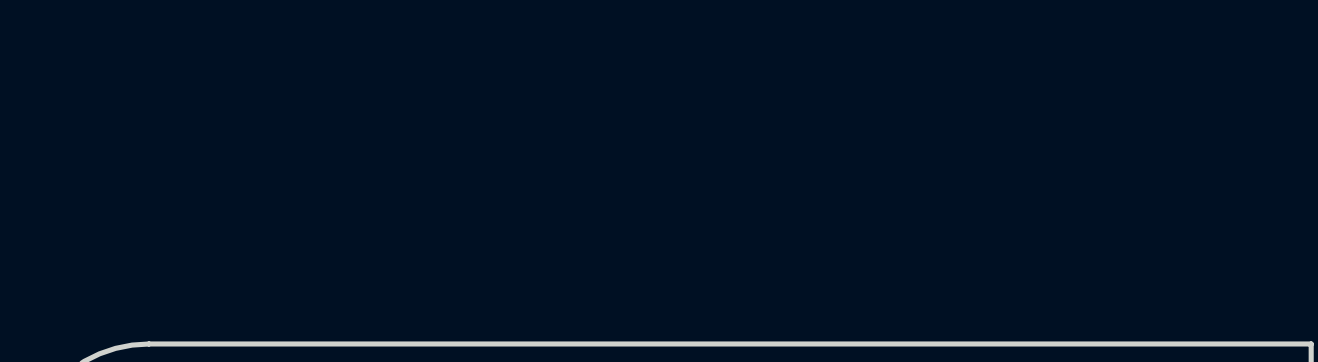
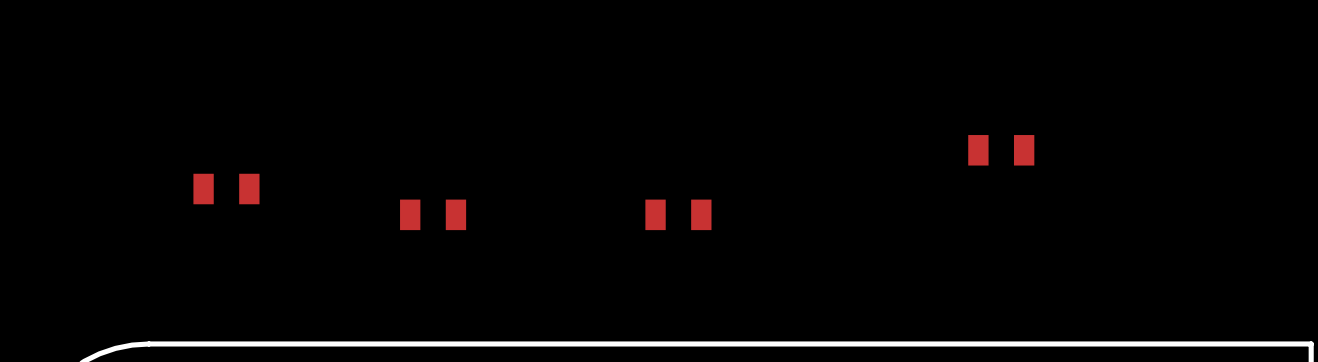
part: none -> (1001, 150)
part: none -> (226, 189)
part: none -> (433, 214)
part: none -> (678, 214)

